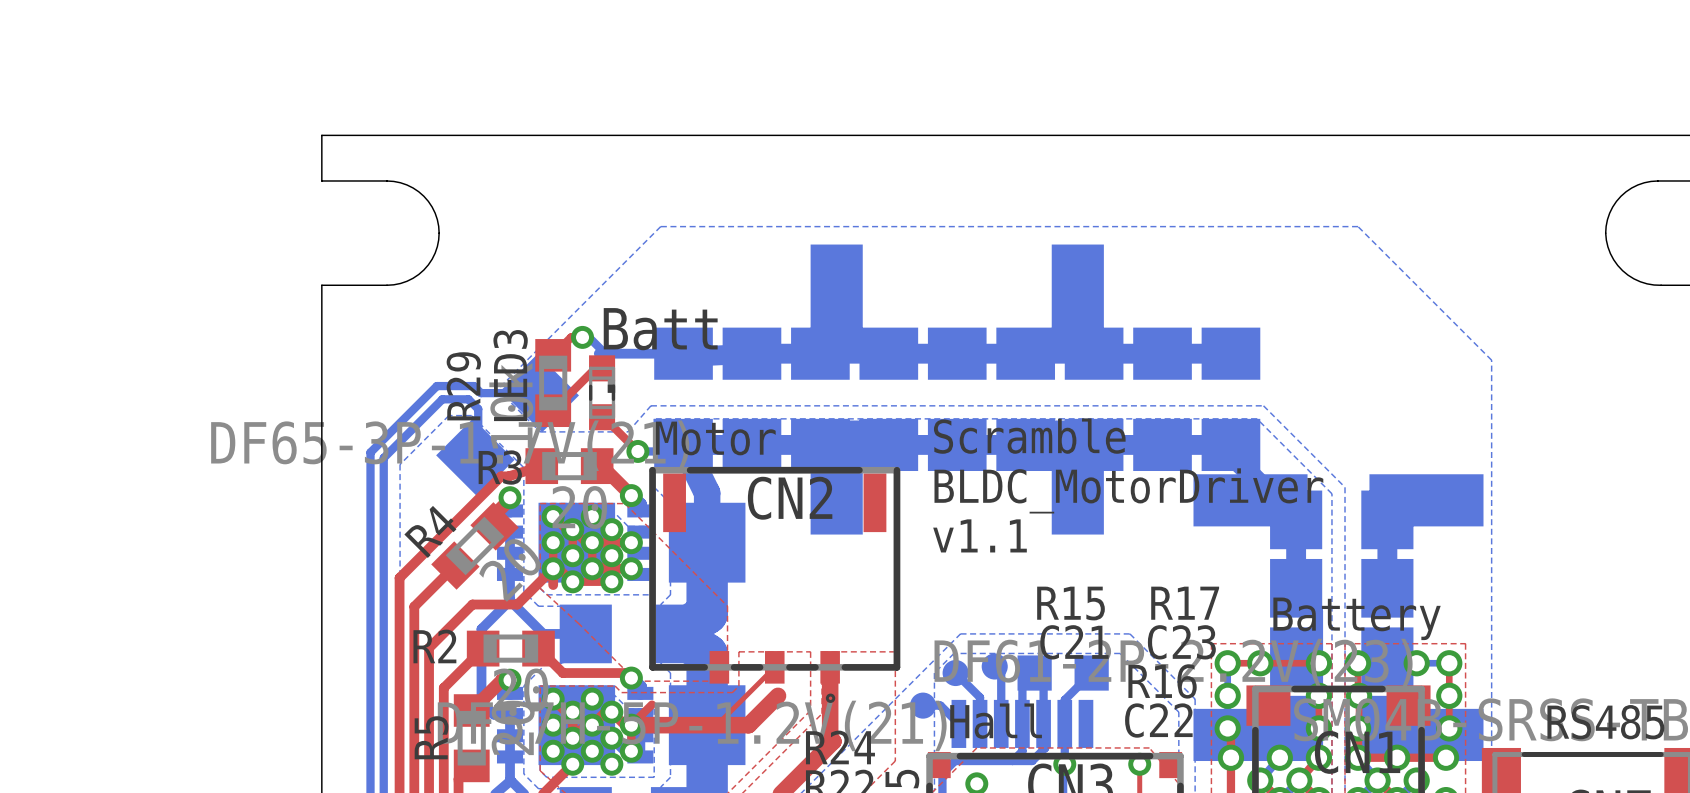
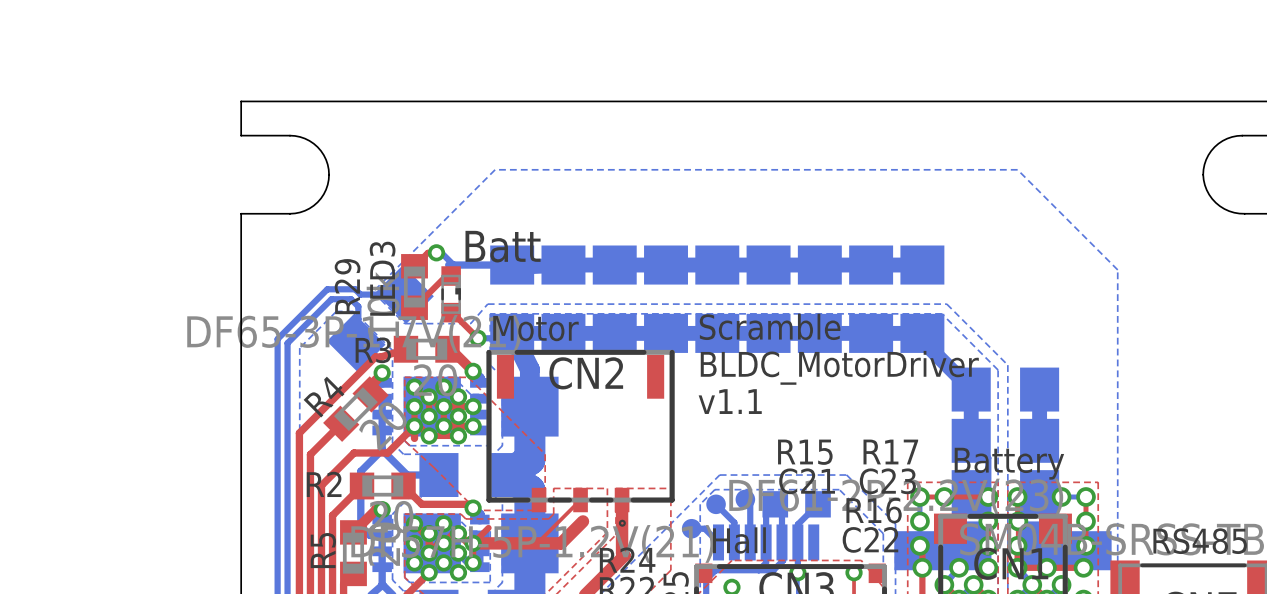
part: (836, 389) -> none
part: (1077, 389) -> none
part: (1338, 500) -> none

